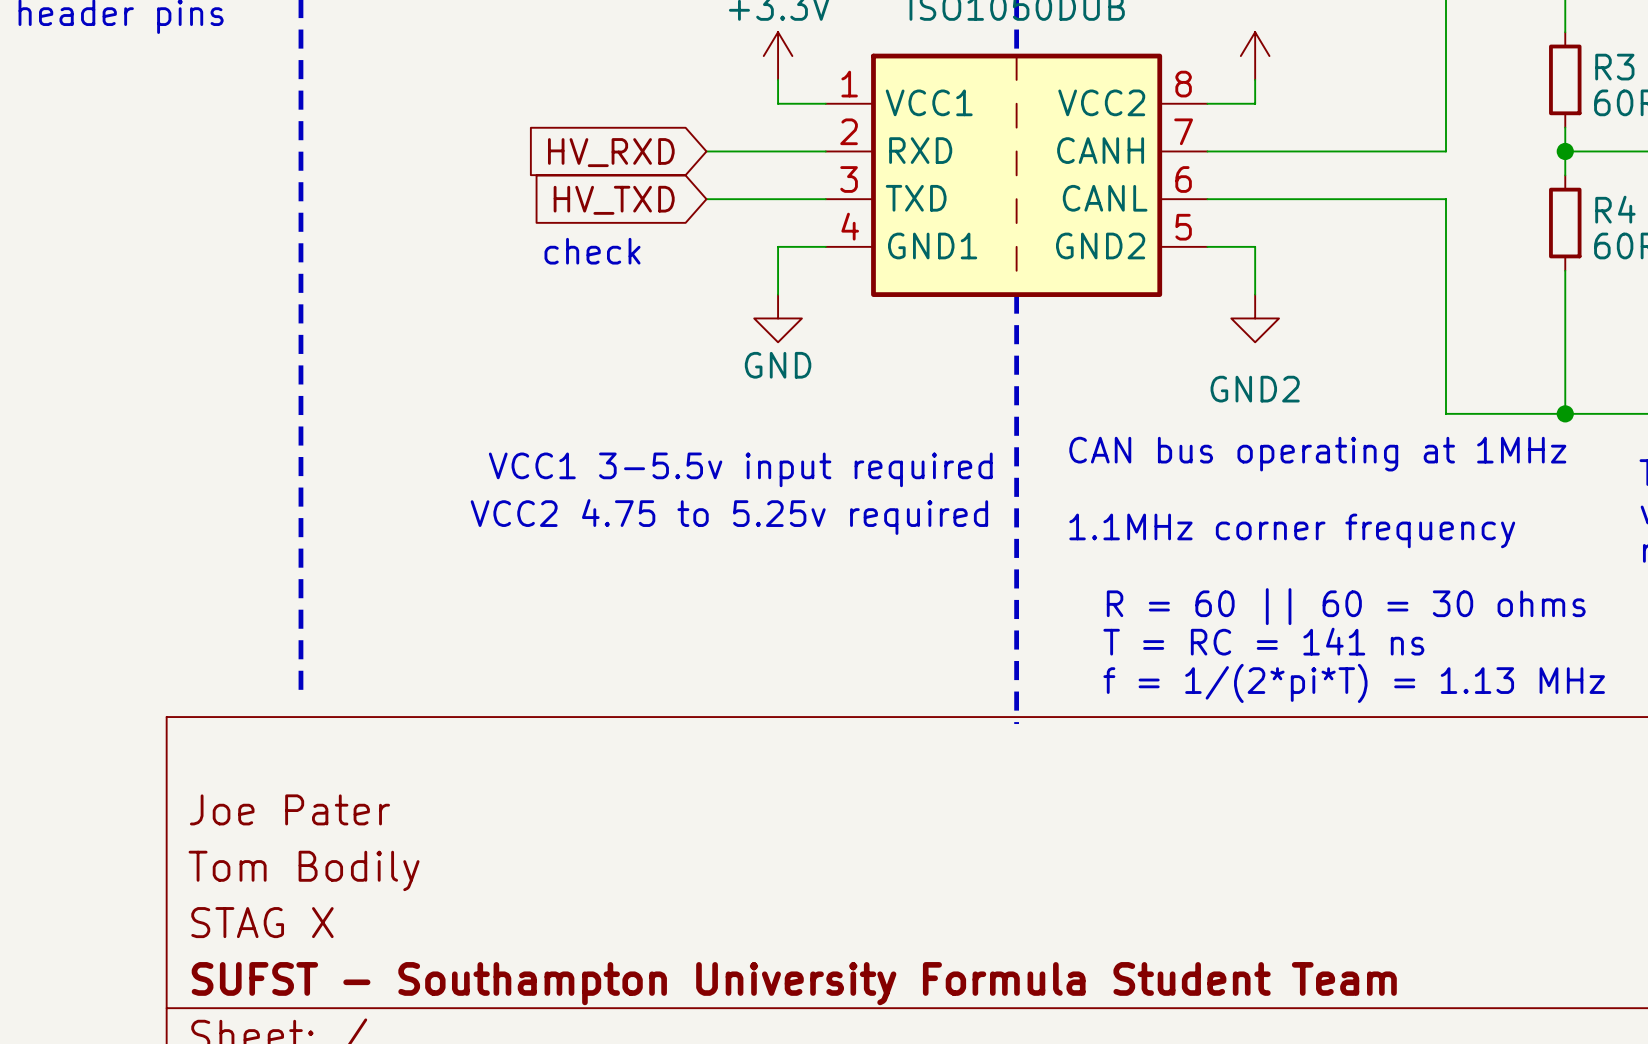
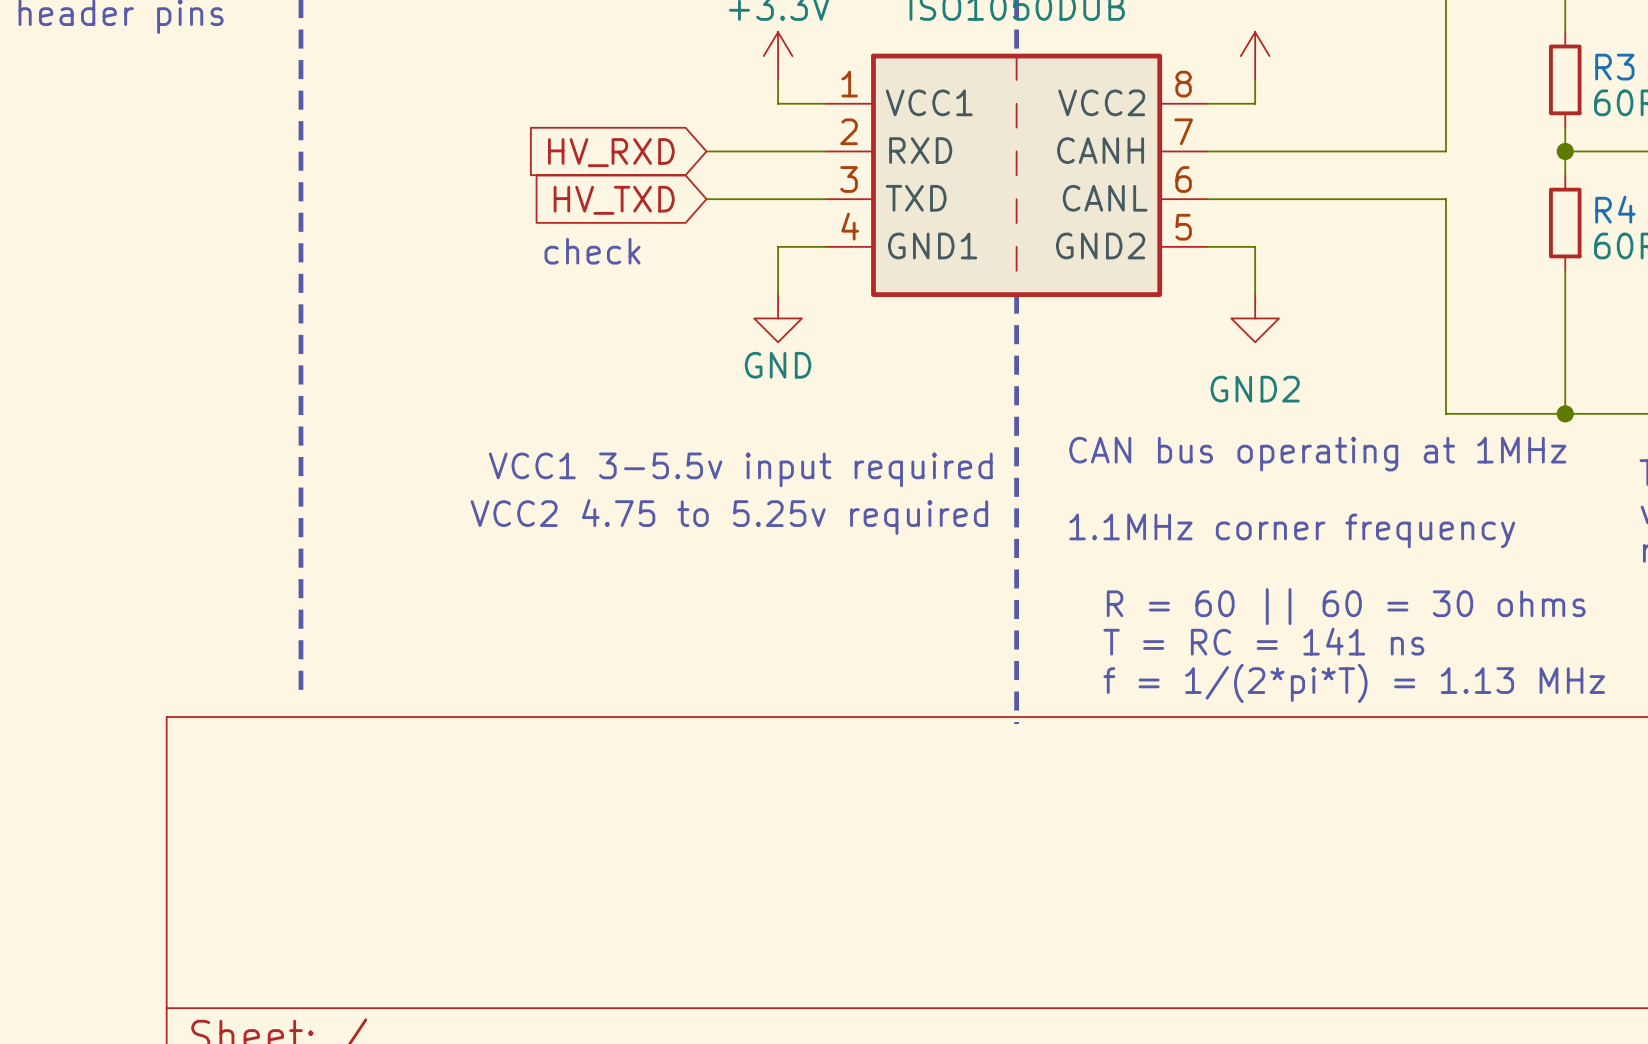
title block: Joe Pater (289, 809) -> none
title block: Tom Bodily (304, 870) -> none
title block: STAG X (262, 922) -> none
title block: SUFST - Southampton University Formula Student Team (794, 983) -> none

